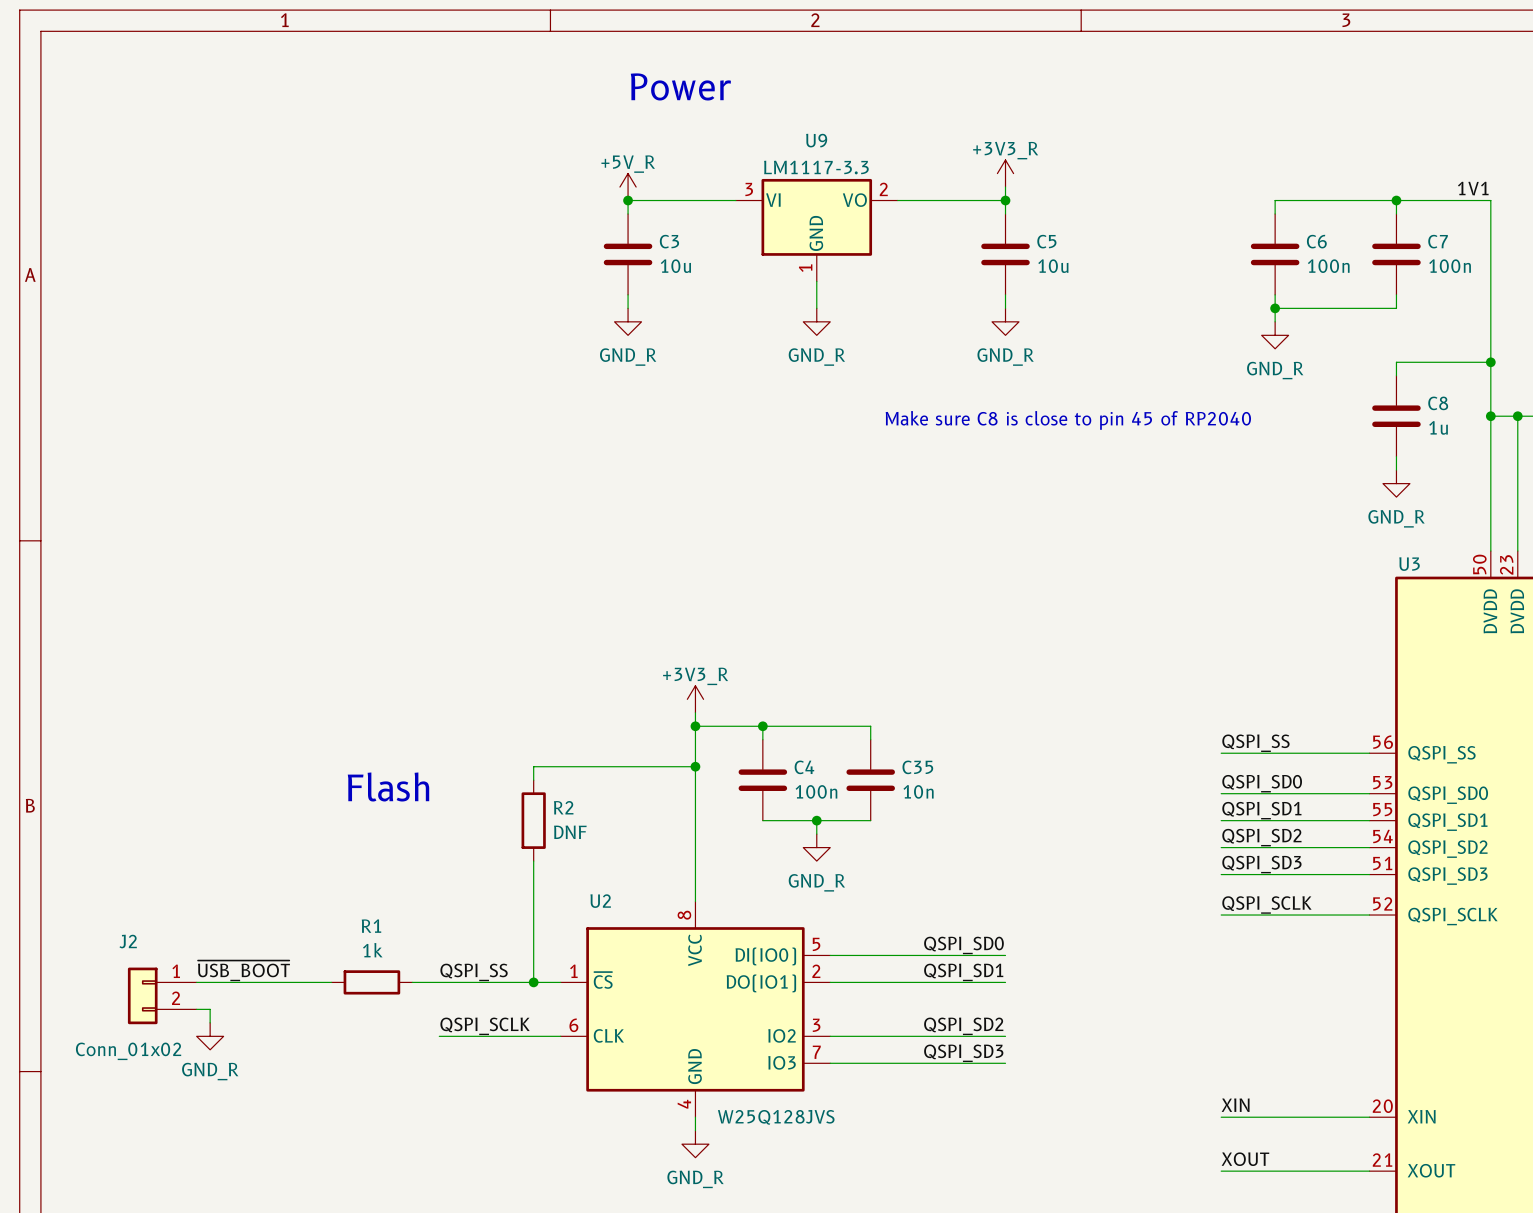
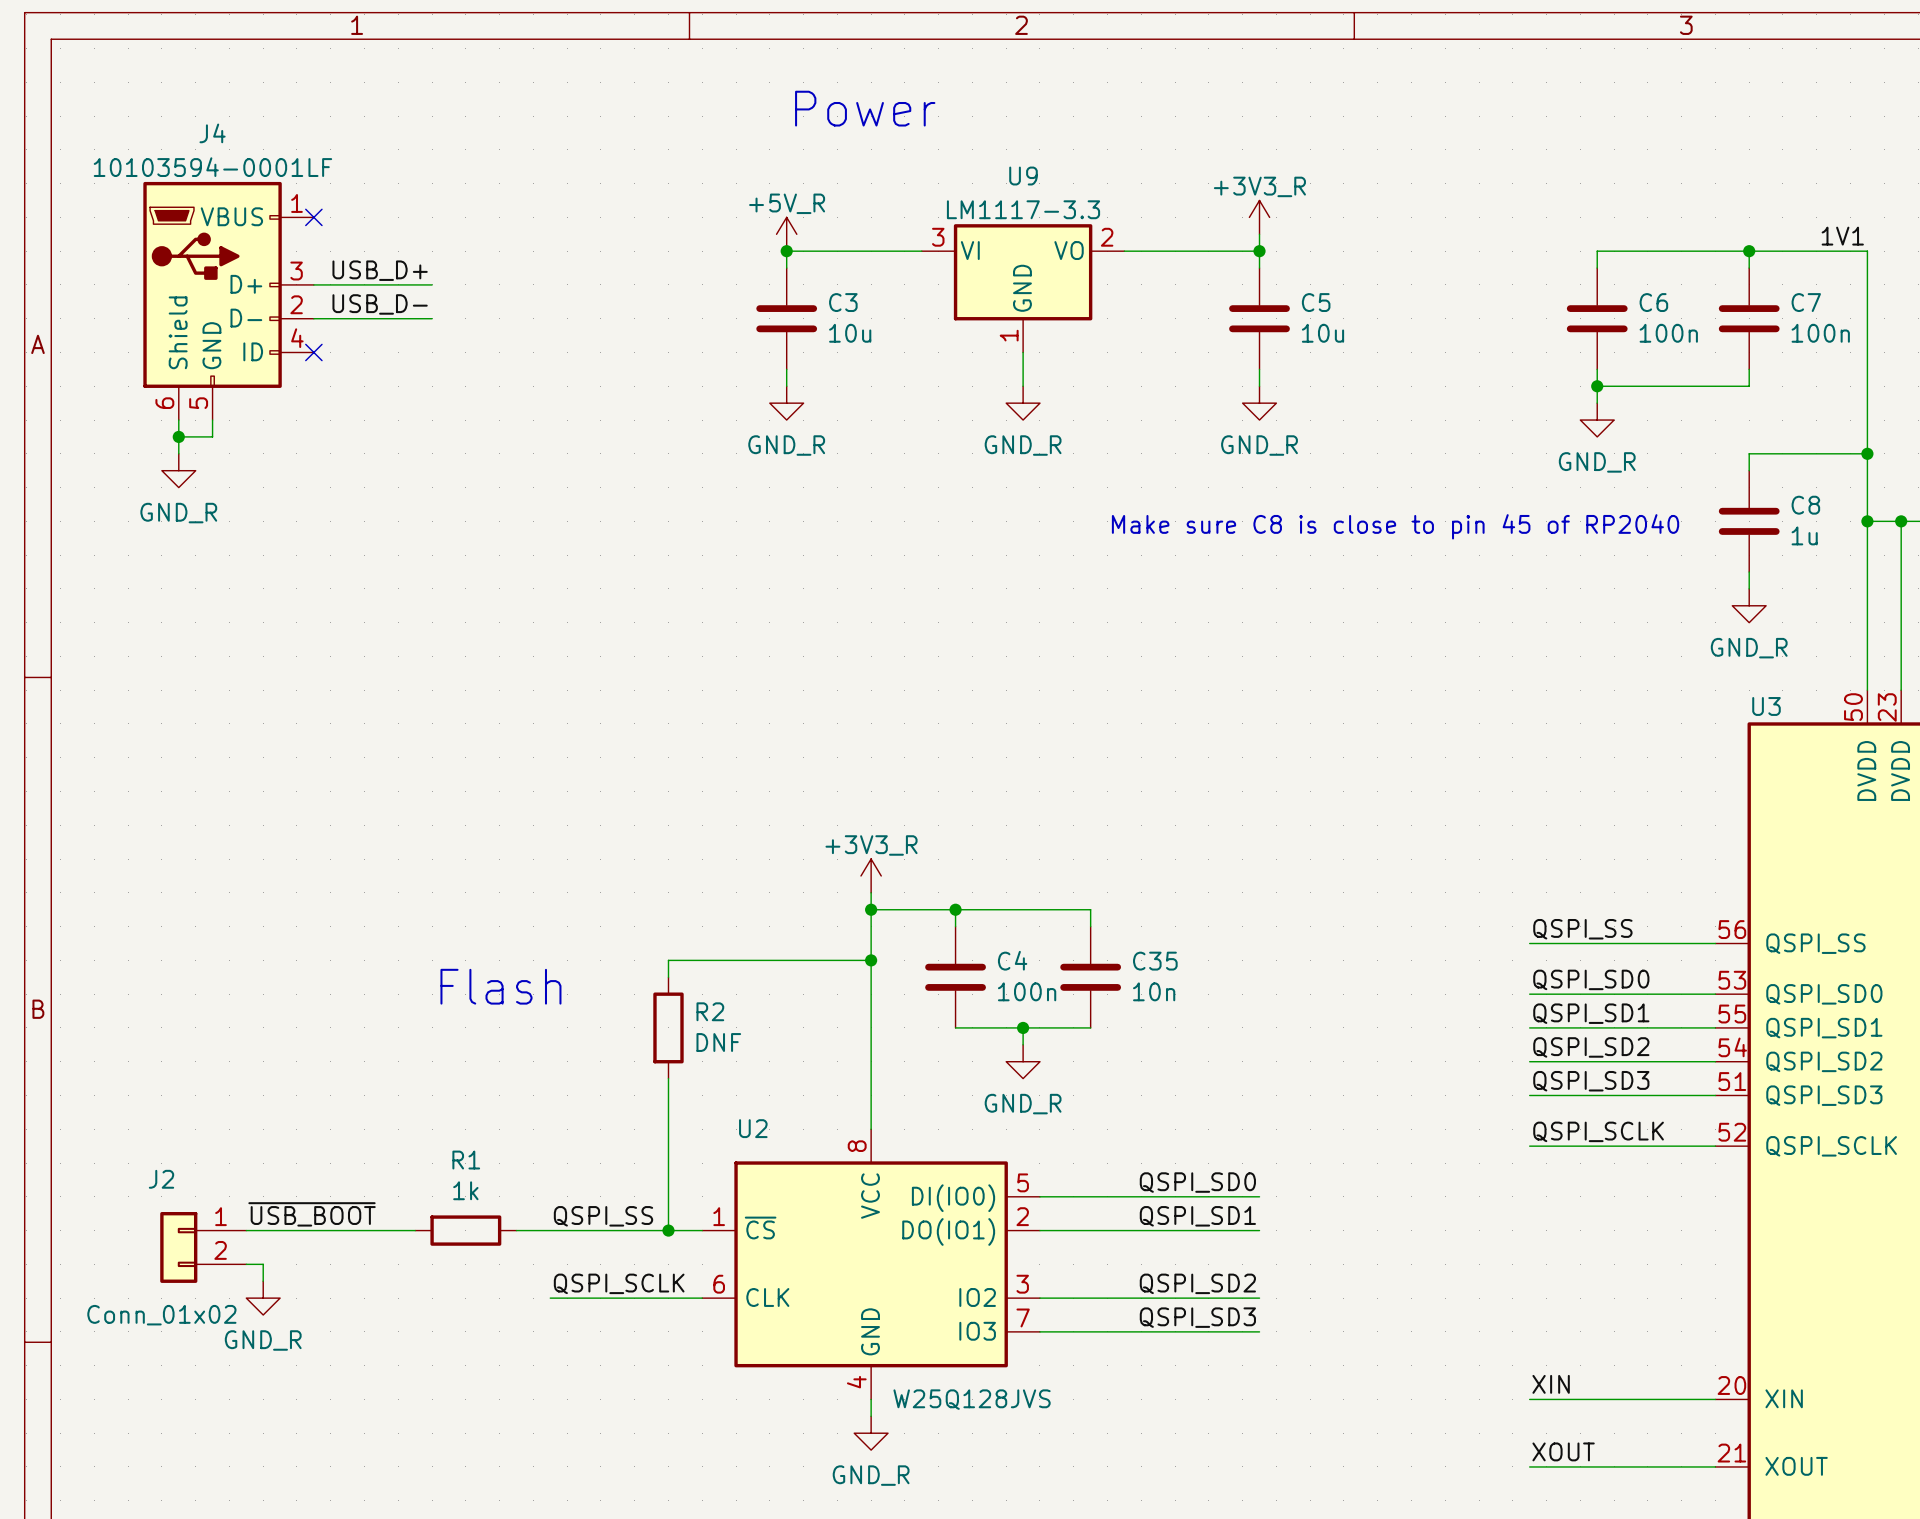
no-connect mark: none -> (313, 217)
label: none -> USB_D+ (380, 270)
wire: none -> (313, 284) (432, 284)
J4: none -> 10103594-0001LF (228, 300)
label: none -> USB_D- (380, 304)
wire: none -> (313, 318) (432, 318)
no-connect mark: none -> (313, 352)
wire: none -> (178, 420) (178, 453)
wire: none -> (212, 420) (212, 436) (178, 436)
junction: none -> (178, 436)
power symbol: none -> GND_R (178, 470)

